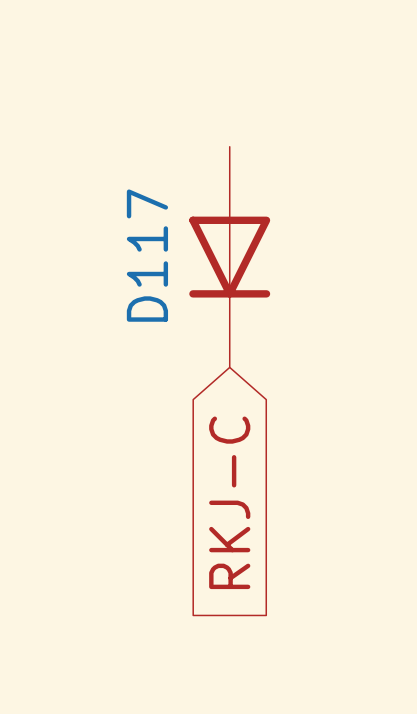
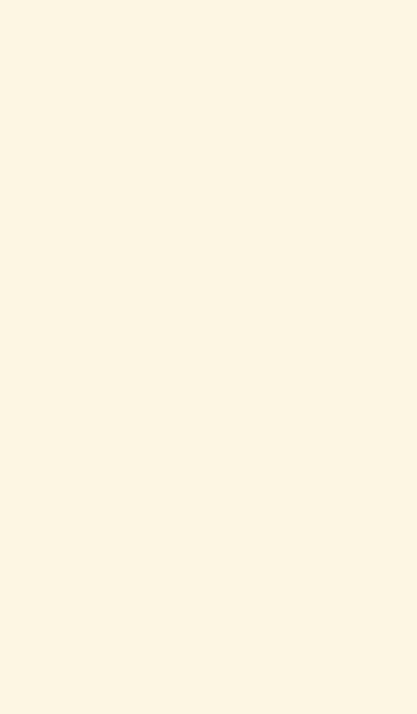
D117: (229, 257) -> none
global label: RKJ-C (229, 502) -> none

